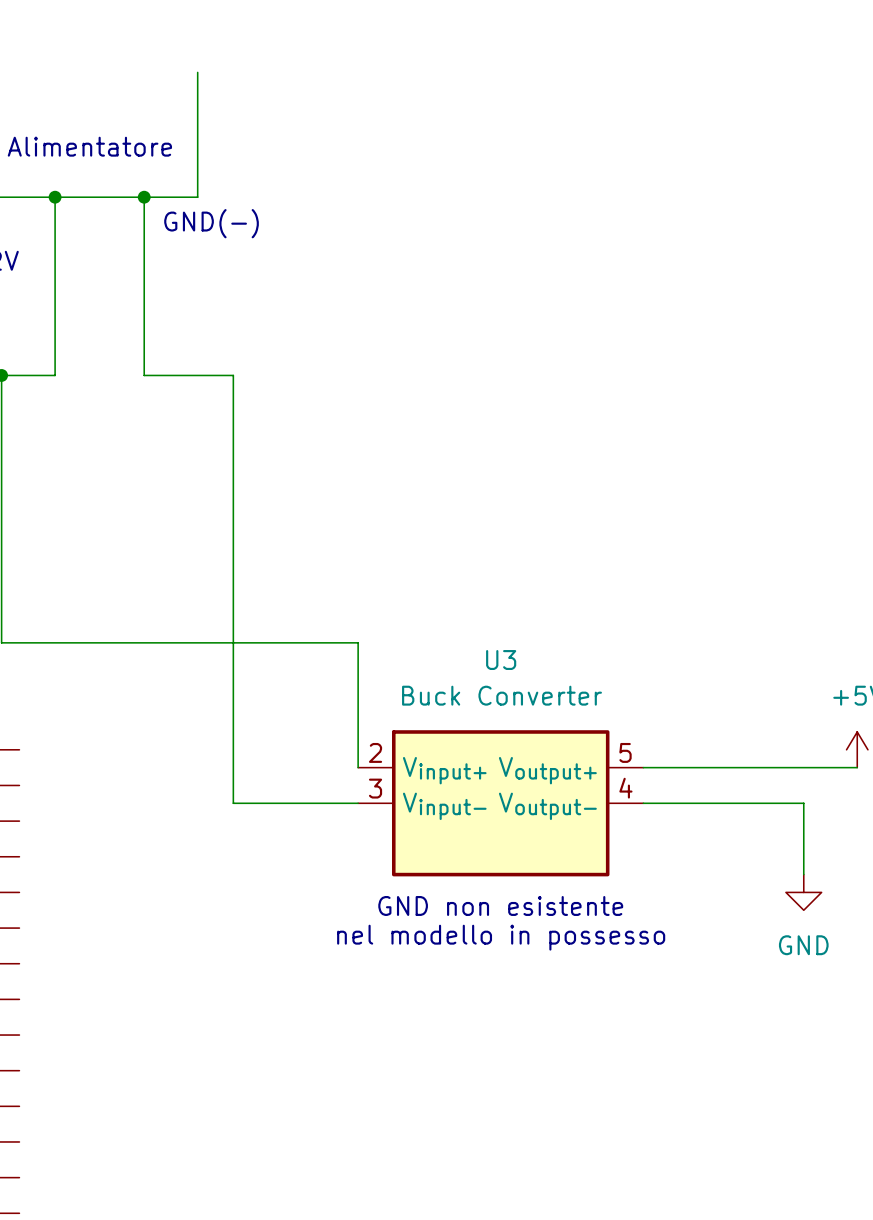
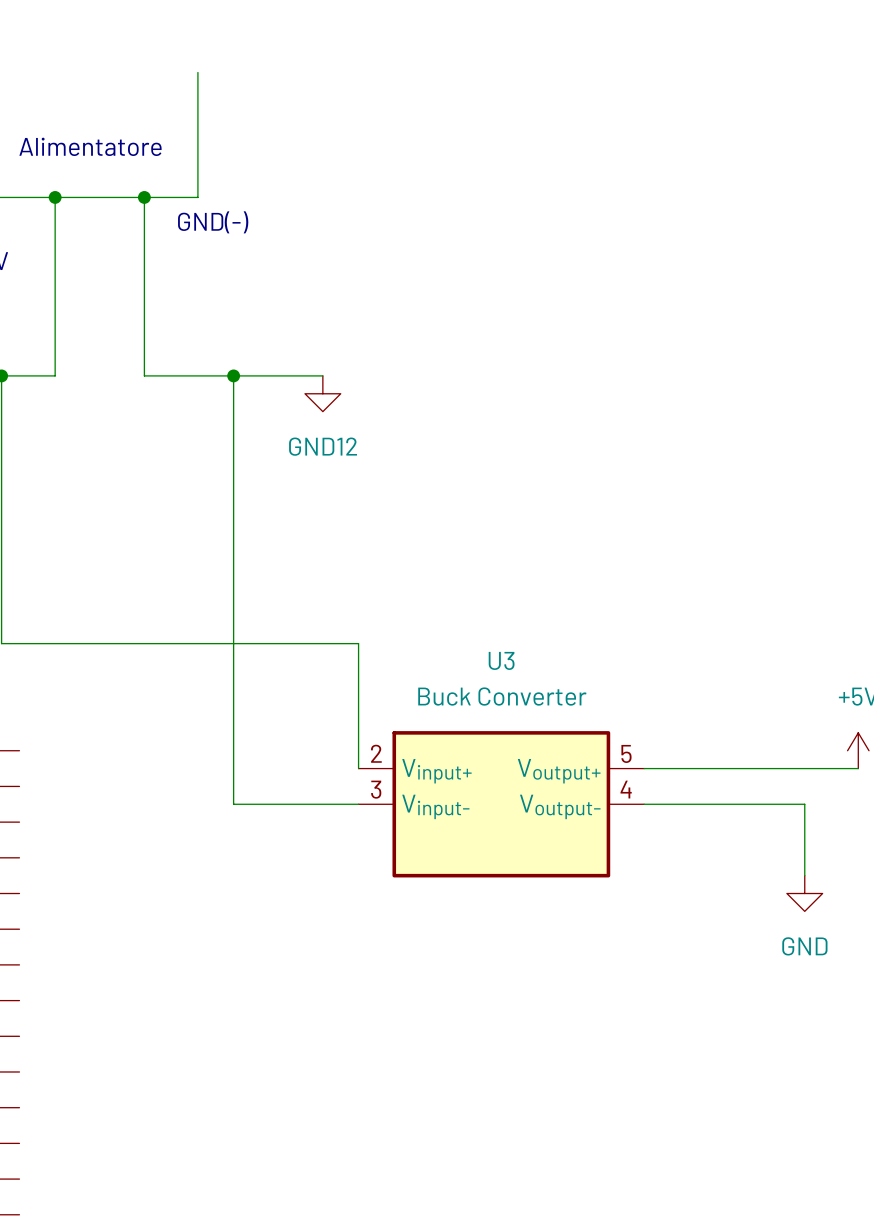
wire: none -> (233, 375) (322, 375)
junction: none -> (233, 375)
power symbol: none -> GND12 (322, 393)
text: GND non esistente (500, 905) -> none
text: nel modello in possesso (501, 937) -> none

